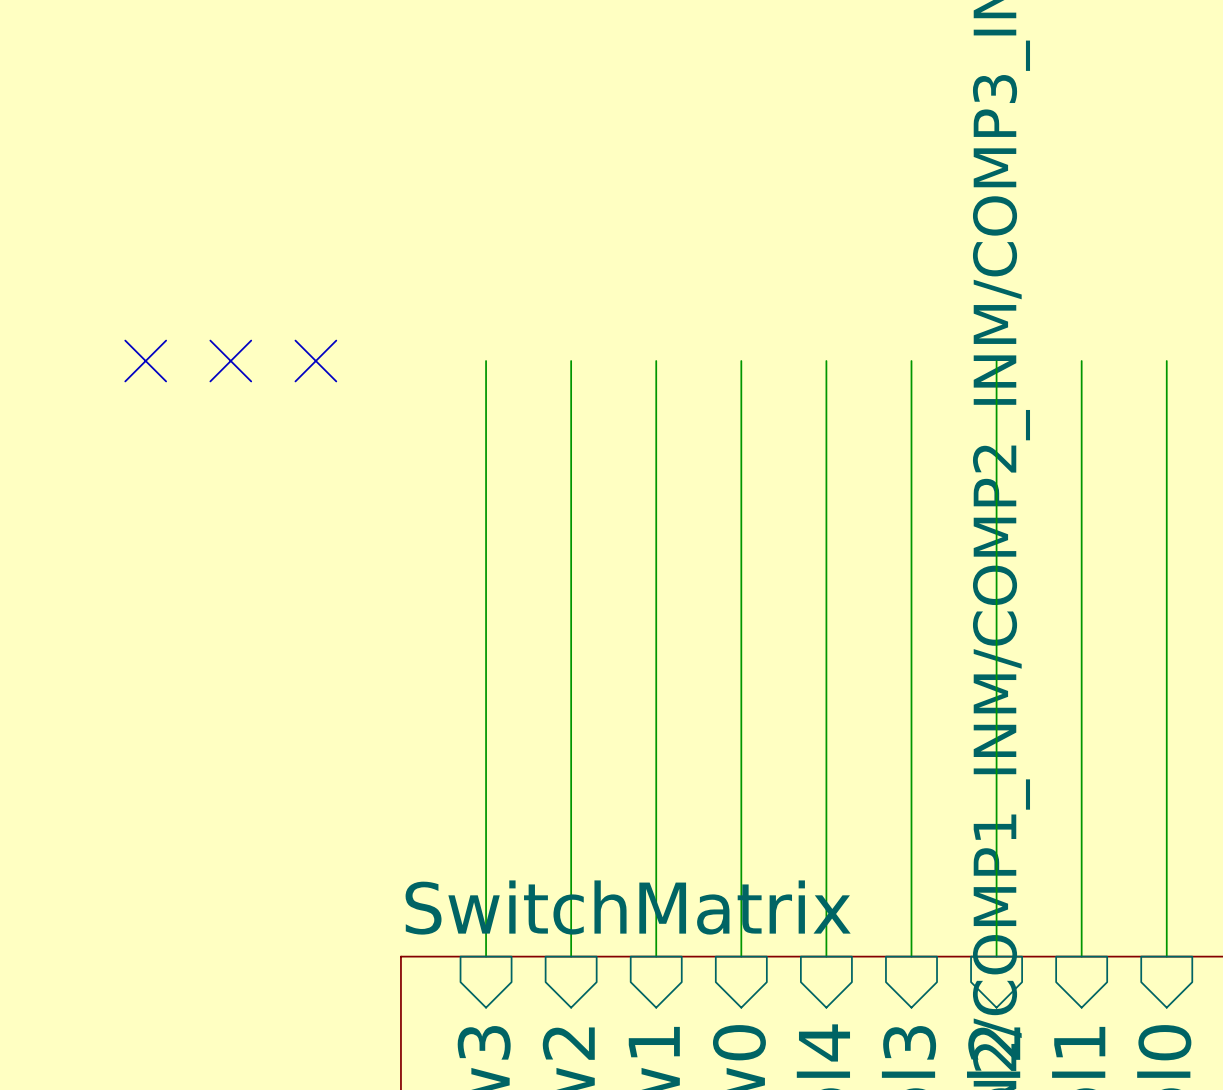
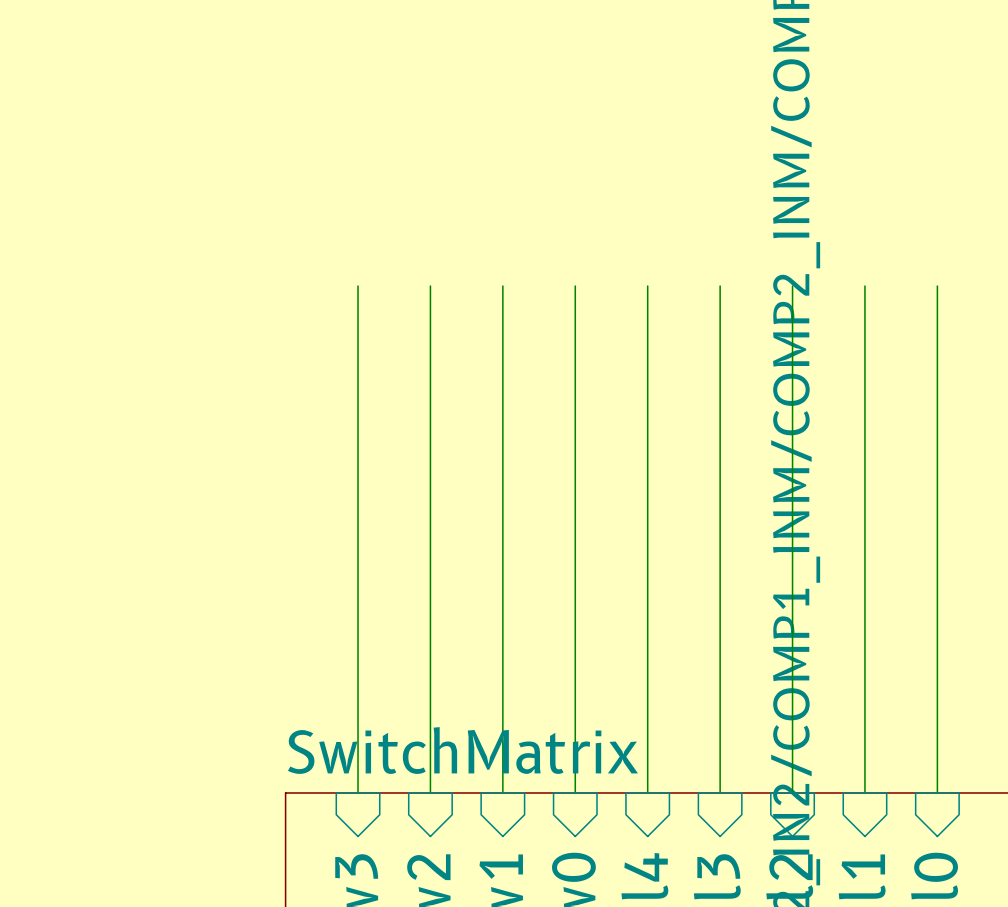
no-connect mark: (145, 361) -> none
no-connect mark: (230, 361) -> none
no-connect mark: (315, 361) -> none

